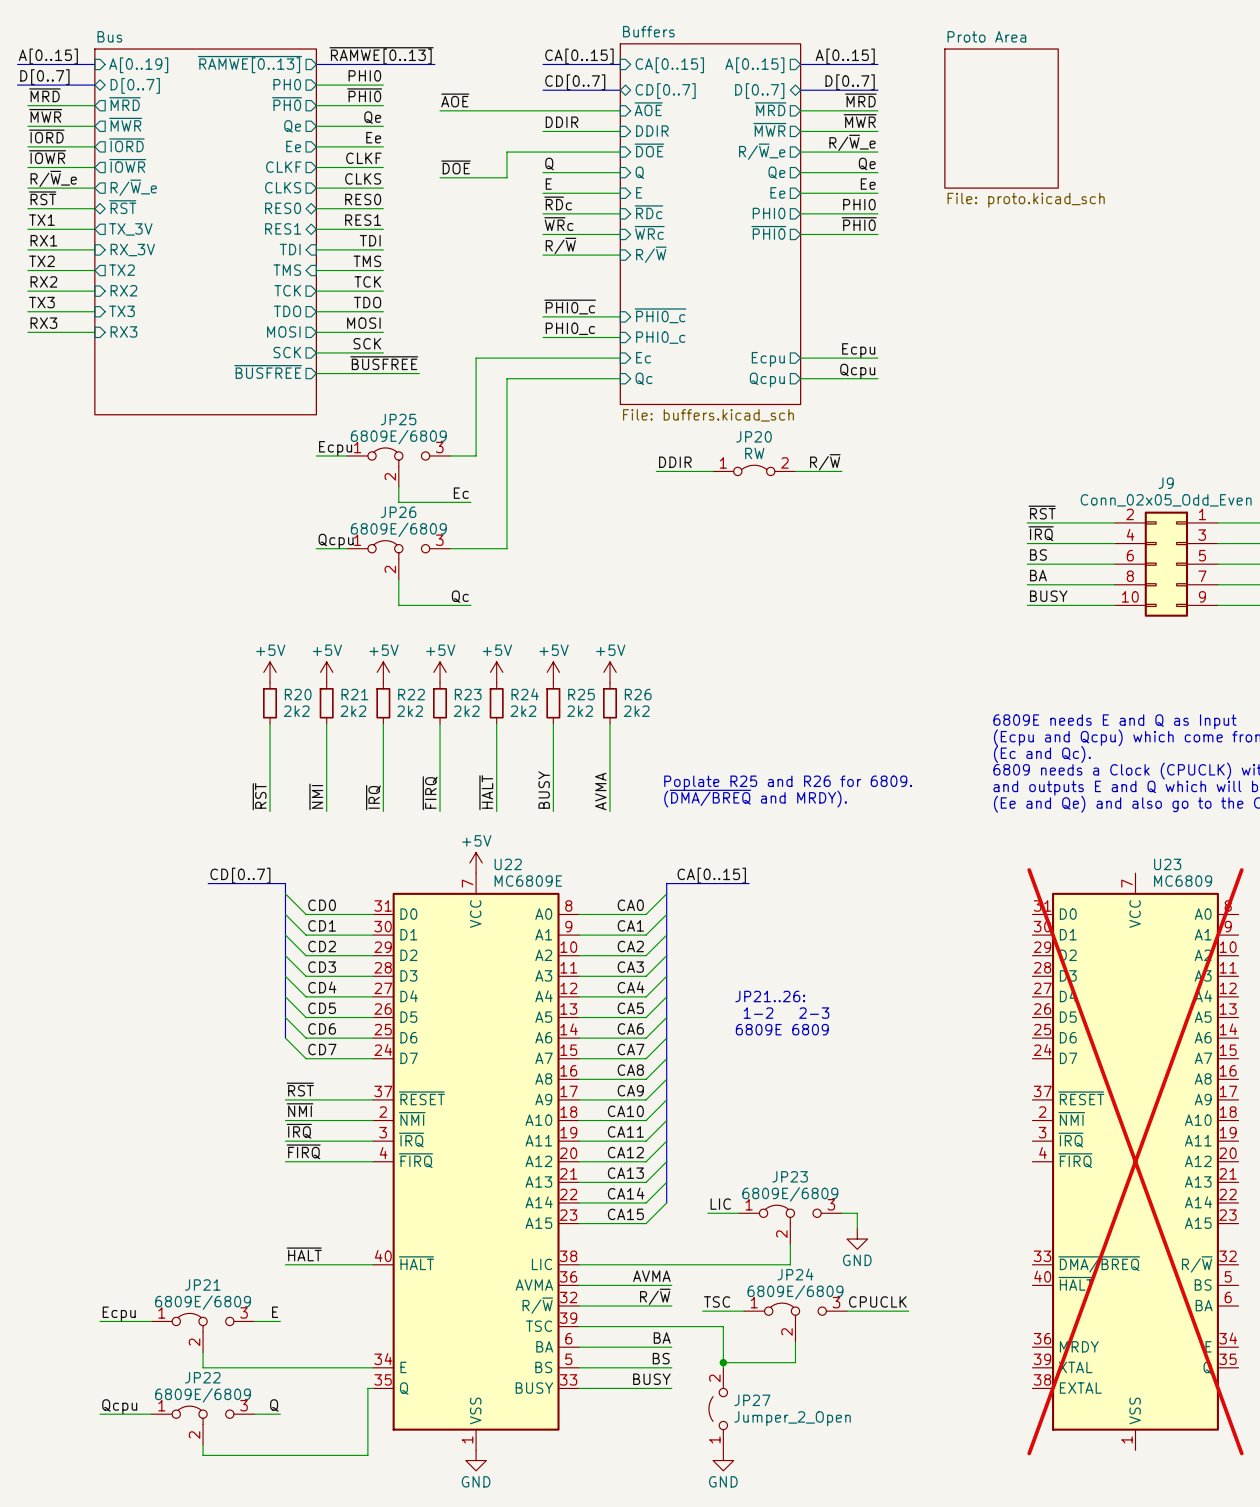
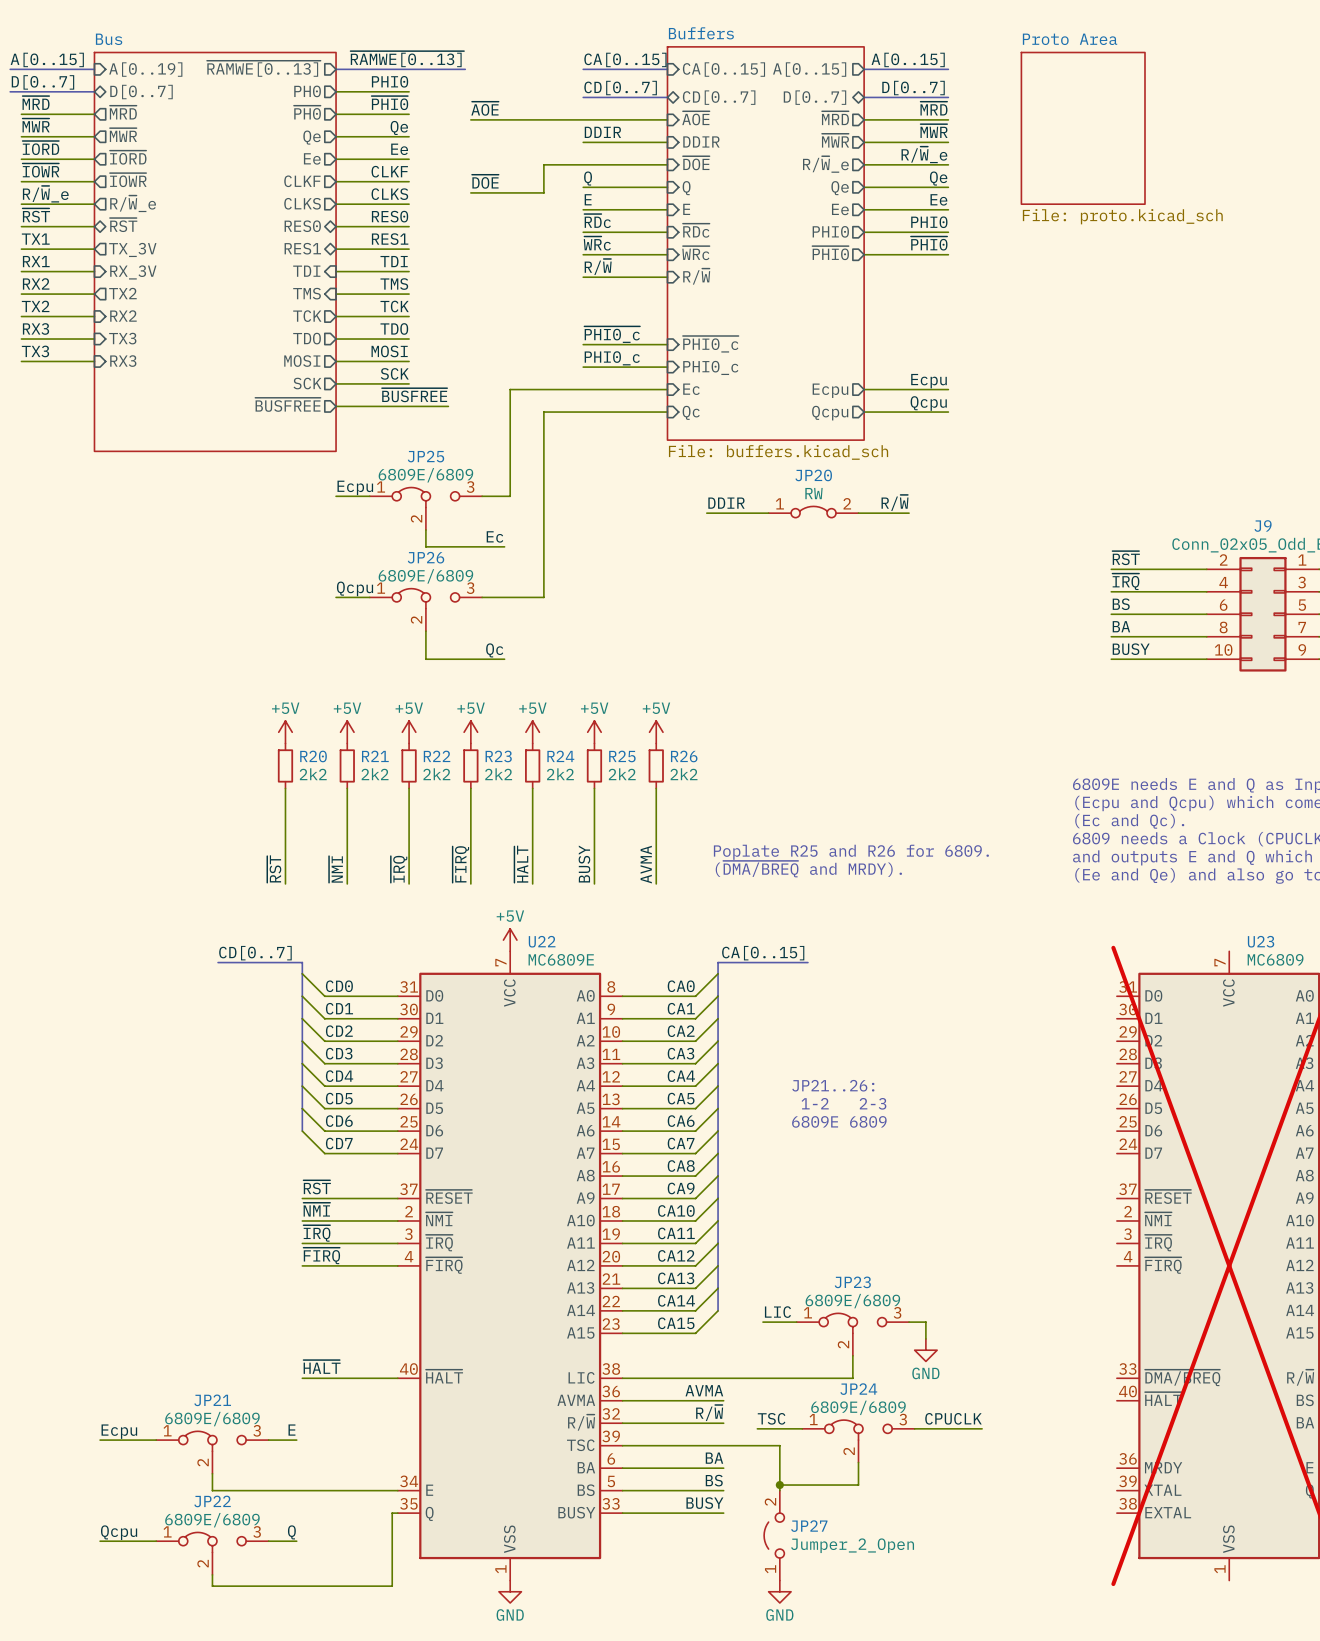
label: TX2 (41, 261) -> RX2 (36, 283)
label: RX2 (43, 281) -> TX2 (35, 306)
label: TX3 (41, 302) -> RX3 (36, 328)
label: RX3 (43, 323) -> TX3 (35, 351)

